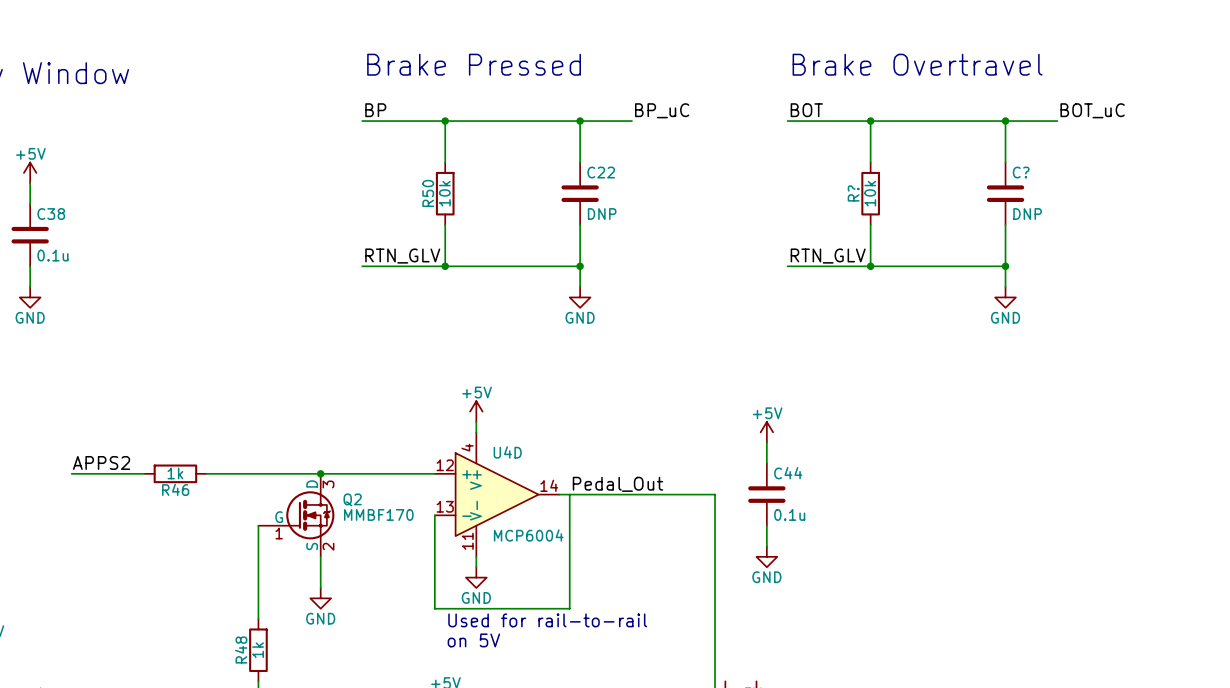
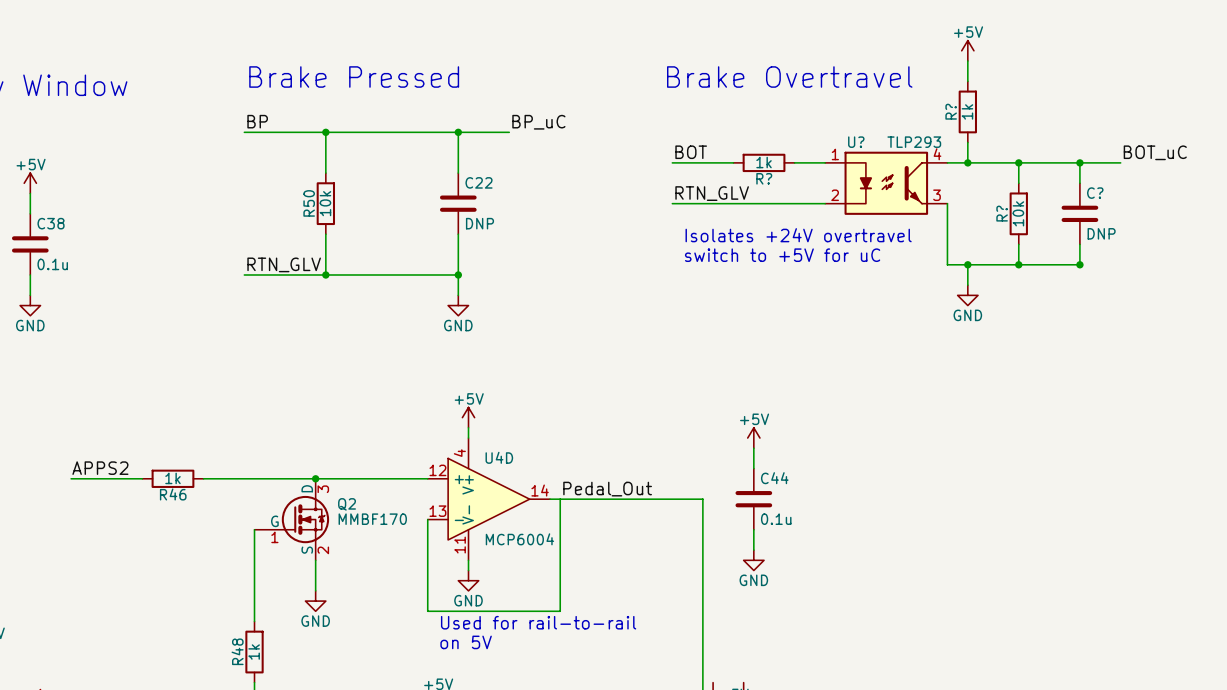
power symbol: none -> +5V (967, 50)
wire: none -> (967, 60) (967, 81)
text position: Brake Pressed (474, 64) -> Brake Pressed (354, 77)
text position: Brake Overtravel (917, 64) -> Brake Overtravel (789, 77)
R?: none -> 1k (967, 111)
label position: BP (375, 110) -> BP (257, 121)
label position: BP_uC (662, 110) -> BP_uC (538, 122)
label position: BOT (806, 110) -> BOT (691, 152)
label position: BOT_uC (1092, 110) -> BOT_uC (1155, 152)
wire: none -> (244, 132) (356, 132)
junction: none -> (325, 132)
wire: (445, 121) (445, 162) -> (325, 132) (325, 173)
junction position: (445, 121) -> (458, 132)
wire: (517, 121) (631, 121) -> none
wire: (580, 121) (580, 162) -> (458, 132) (458, 173)
junction: (580, 121) -> none
wire: (787, 121) (1057, 121) -> none
junction: (870, 121) -> none
wire: (1005, 121) (1005, 162) -> none
junction: (1005, 121) -> none
wire: none -> (967, 142) (967, 162)
wire: none -> (672, 162) (733, 162)
R?: none -> 1k (764, 162)
wire: none -> (794, 162) (825, 162)
wire: none -> (947, 162) (1120, 162)
junction: none -> (967, 162)
wire: none -> (1018, 162) (1018, 183)
junction: none -> (1018, 162)
wire: none -> (1079, 162) (1079, 183)
junction: none -> (1079, 162)
U?: none -> TLP293 (886, 183)
R50 position: (445, 193) -> (325, 203)
C22 position: (580, 193) -> (458, 203)
wire: none -> (672, 203) (825, 203)
R? position: (870, 193) -> (1018, 213)
wire: none -> (947, 203) (947, 264) (1079, 264) (1079, 244)
C? position: (1005, 193) -> (1079, 213)
wire: (445, 224) (445, 266) -> (325, 234) (325, 274)
wire: (580, 224) (580, 287) -> (458, 234) (458, 295)
wire: (870, 224) (870, 266) -> none
wire: (1005, 224) (1005, 287) -> none
text: none -> Isolates +24V overtravel (798, 235)
wire: none -> (1018, 244) (1018, 264)
text: none -> switch to +5V for uC (782, 255)
wire: none -> (967, 264) (967, 285)
junction: none -> (967, 264)
junction: none -> (1018, 264)
junction: none -> (1079, 264)
label position: RTN_GLV (402, 256) -> RTN_GLV (284, 264)
label position: RTN_GLV (828, 256) -> RTN_GLV (712, 193)
wire: none -> (244, 274) (356, 274)
junction: none -> (325, 274)
junction position: (445, 266) -> (458, 274)
wire: (465, 266) (580, 266) -> none
junction: (580, 266) -> none
wire: (787, 266) (1005, 266) -> none
junction: (870, 266) -> none
junction: (1005, 266) -> none
power symbol position: GND (580, 297) -> GND (458, 305)
power symbol position: GND (1005, 297) -> GND (967, 295)

